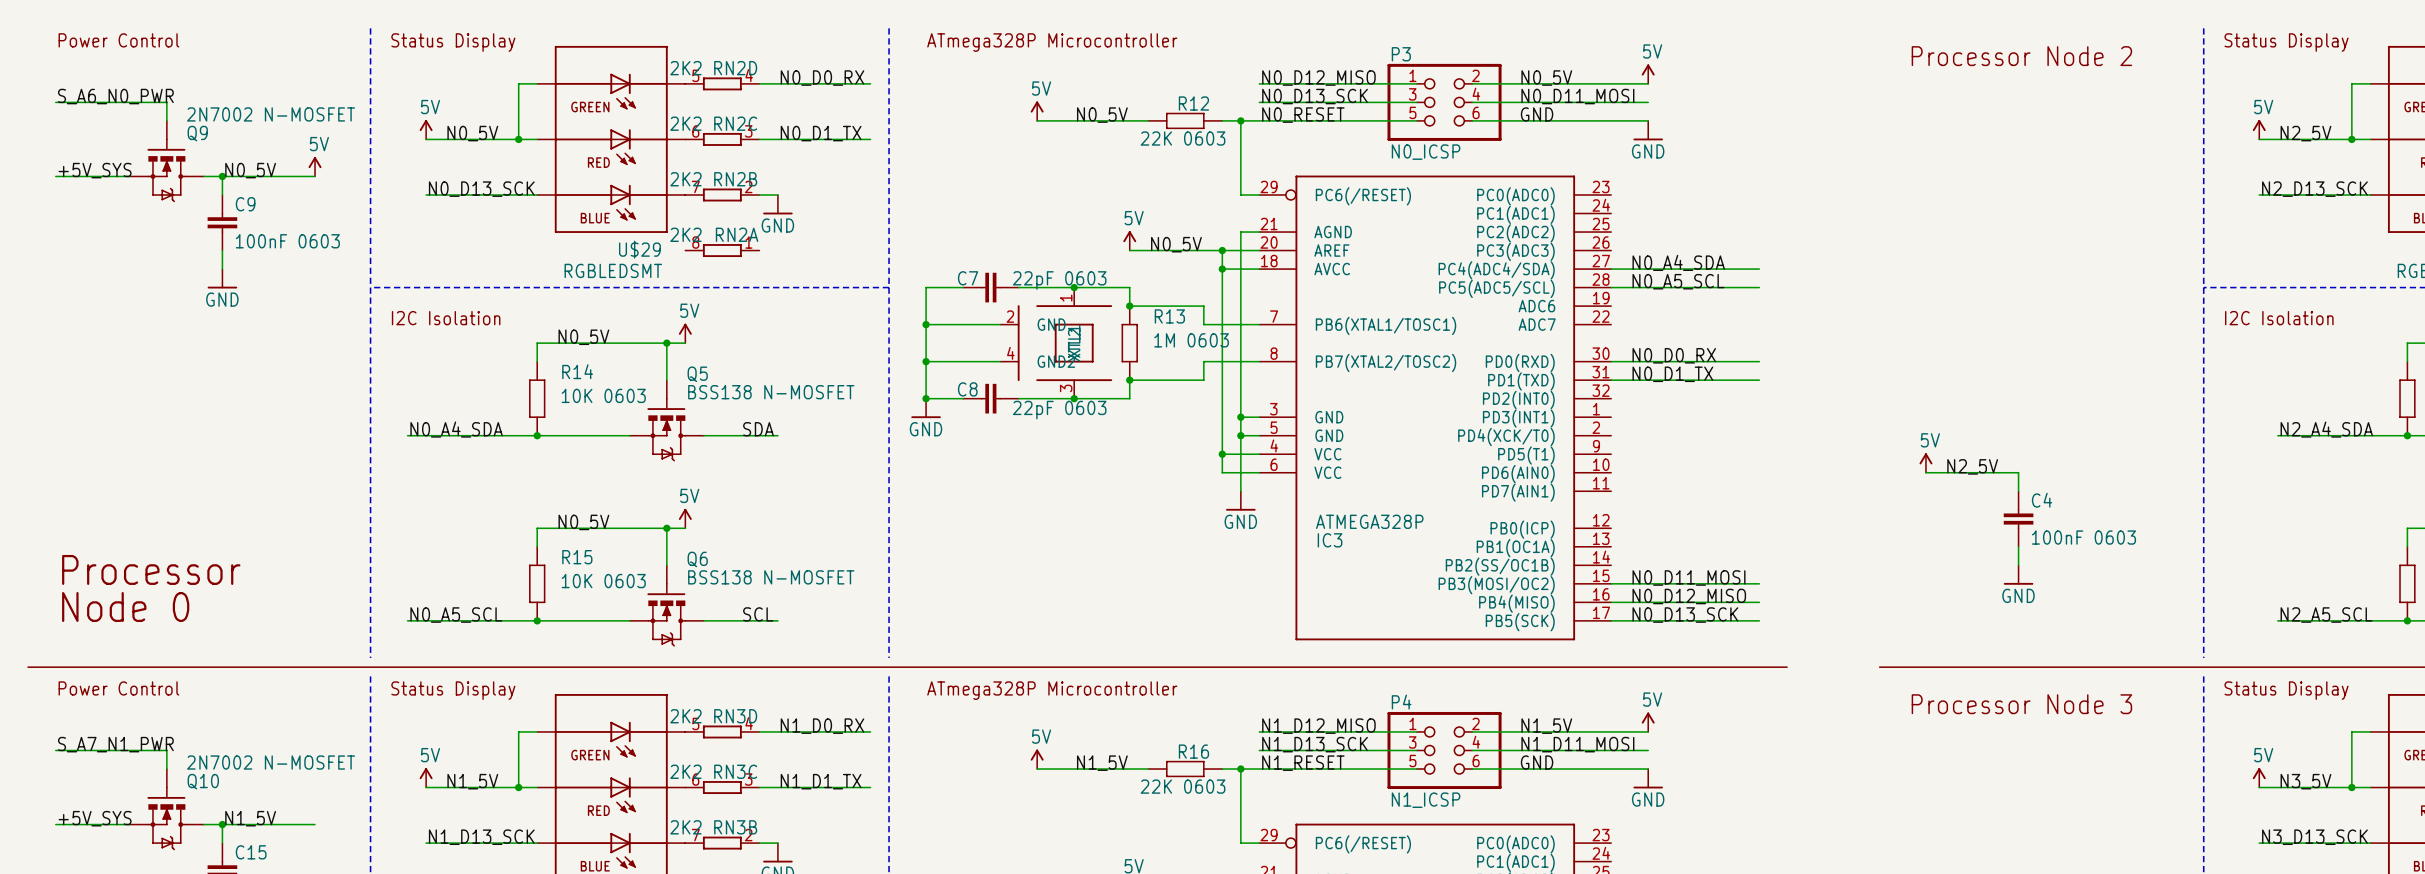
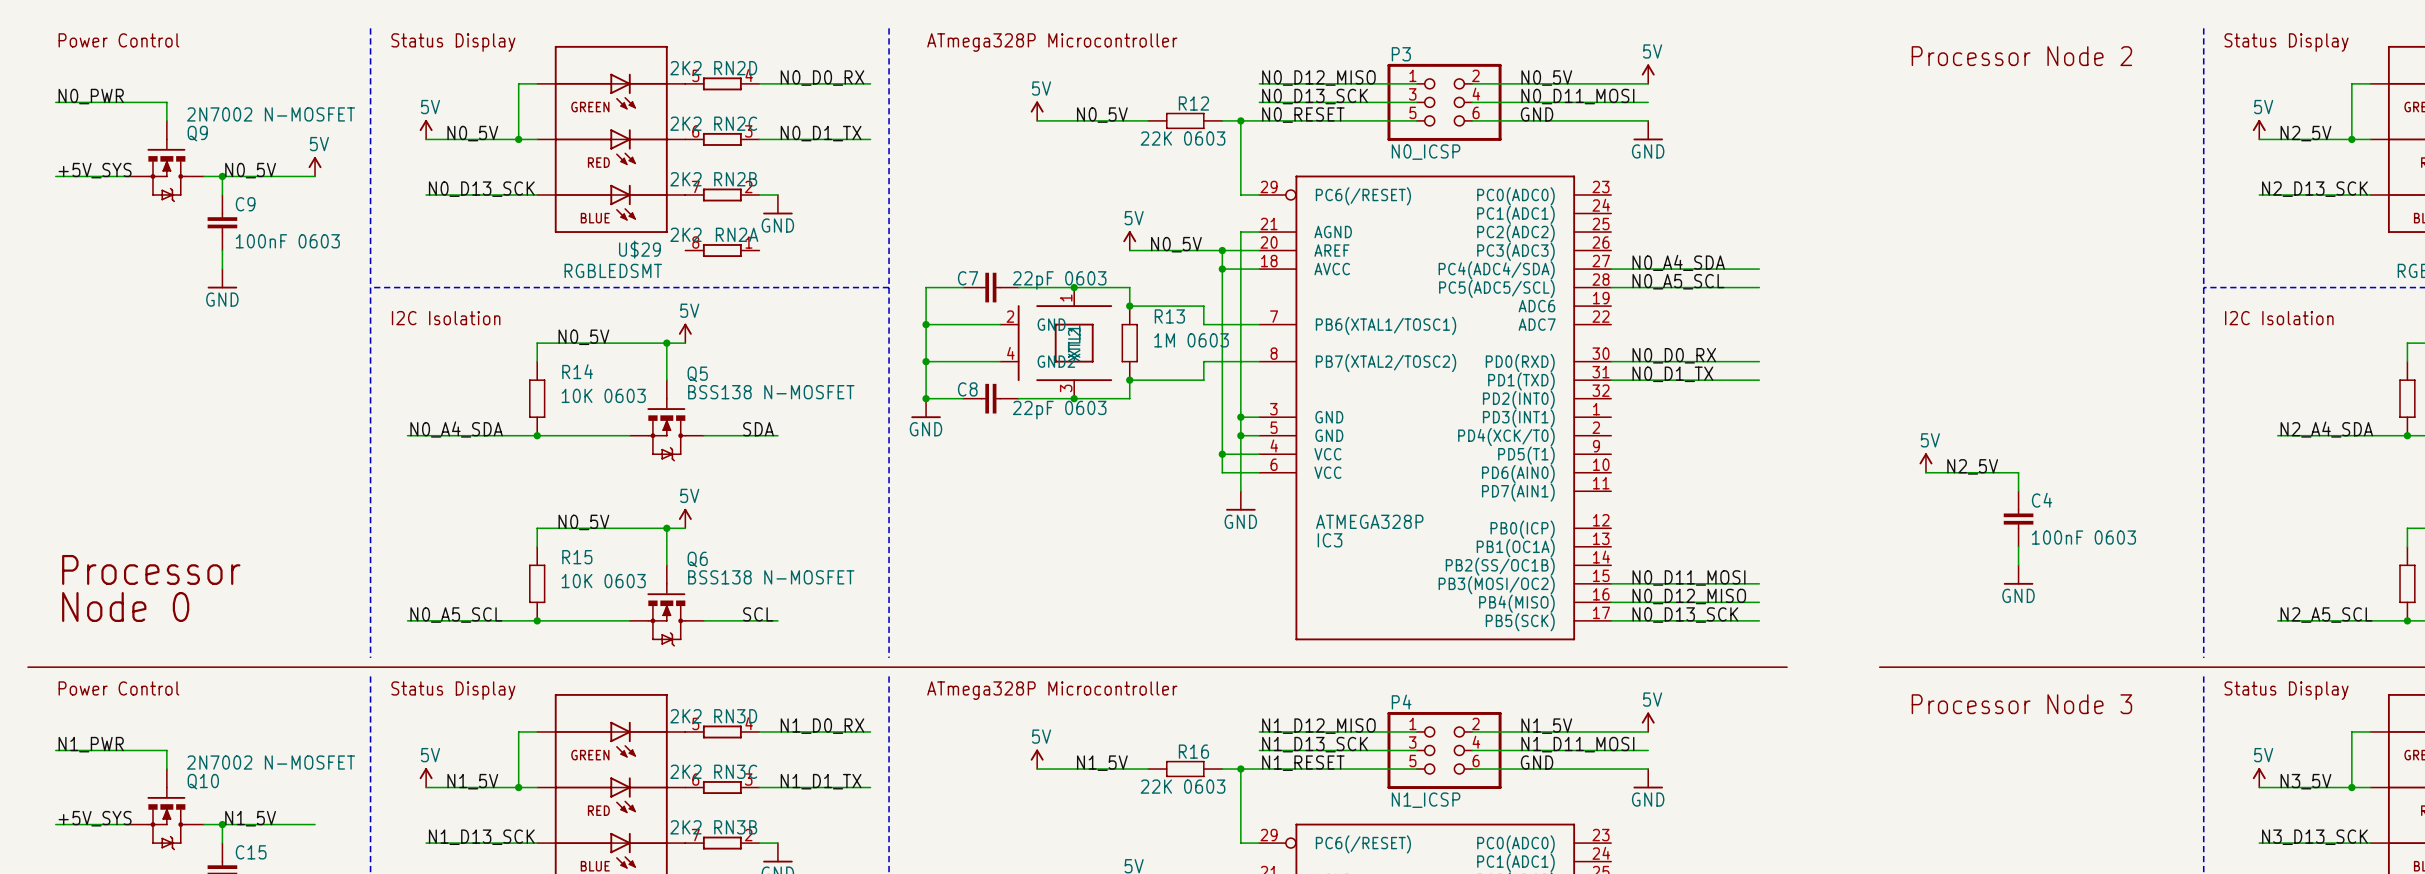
label: S_A6_N0_PWR (115, 96) -> N0_PWR (91, 96)
label: S_A7_N1_PWR (115, 744) -> N1_PWR (91, 744)

